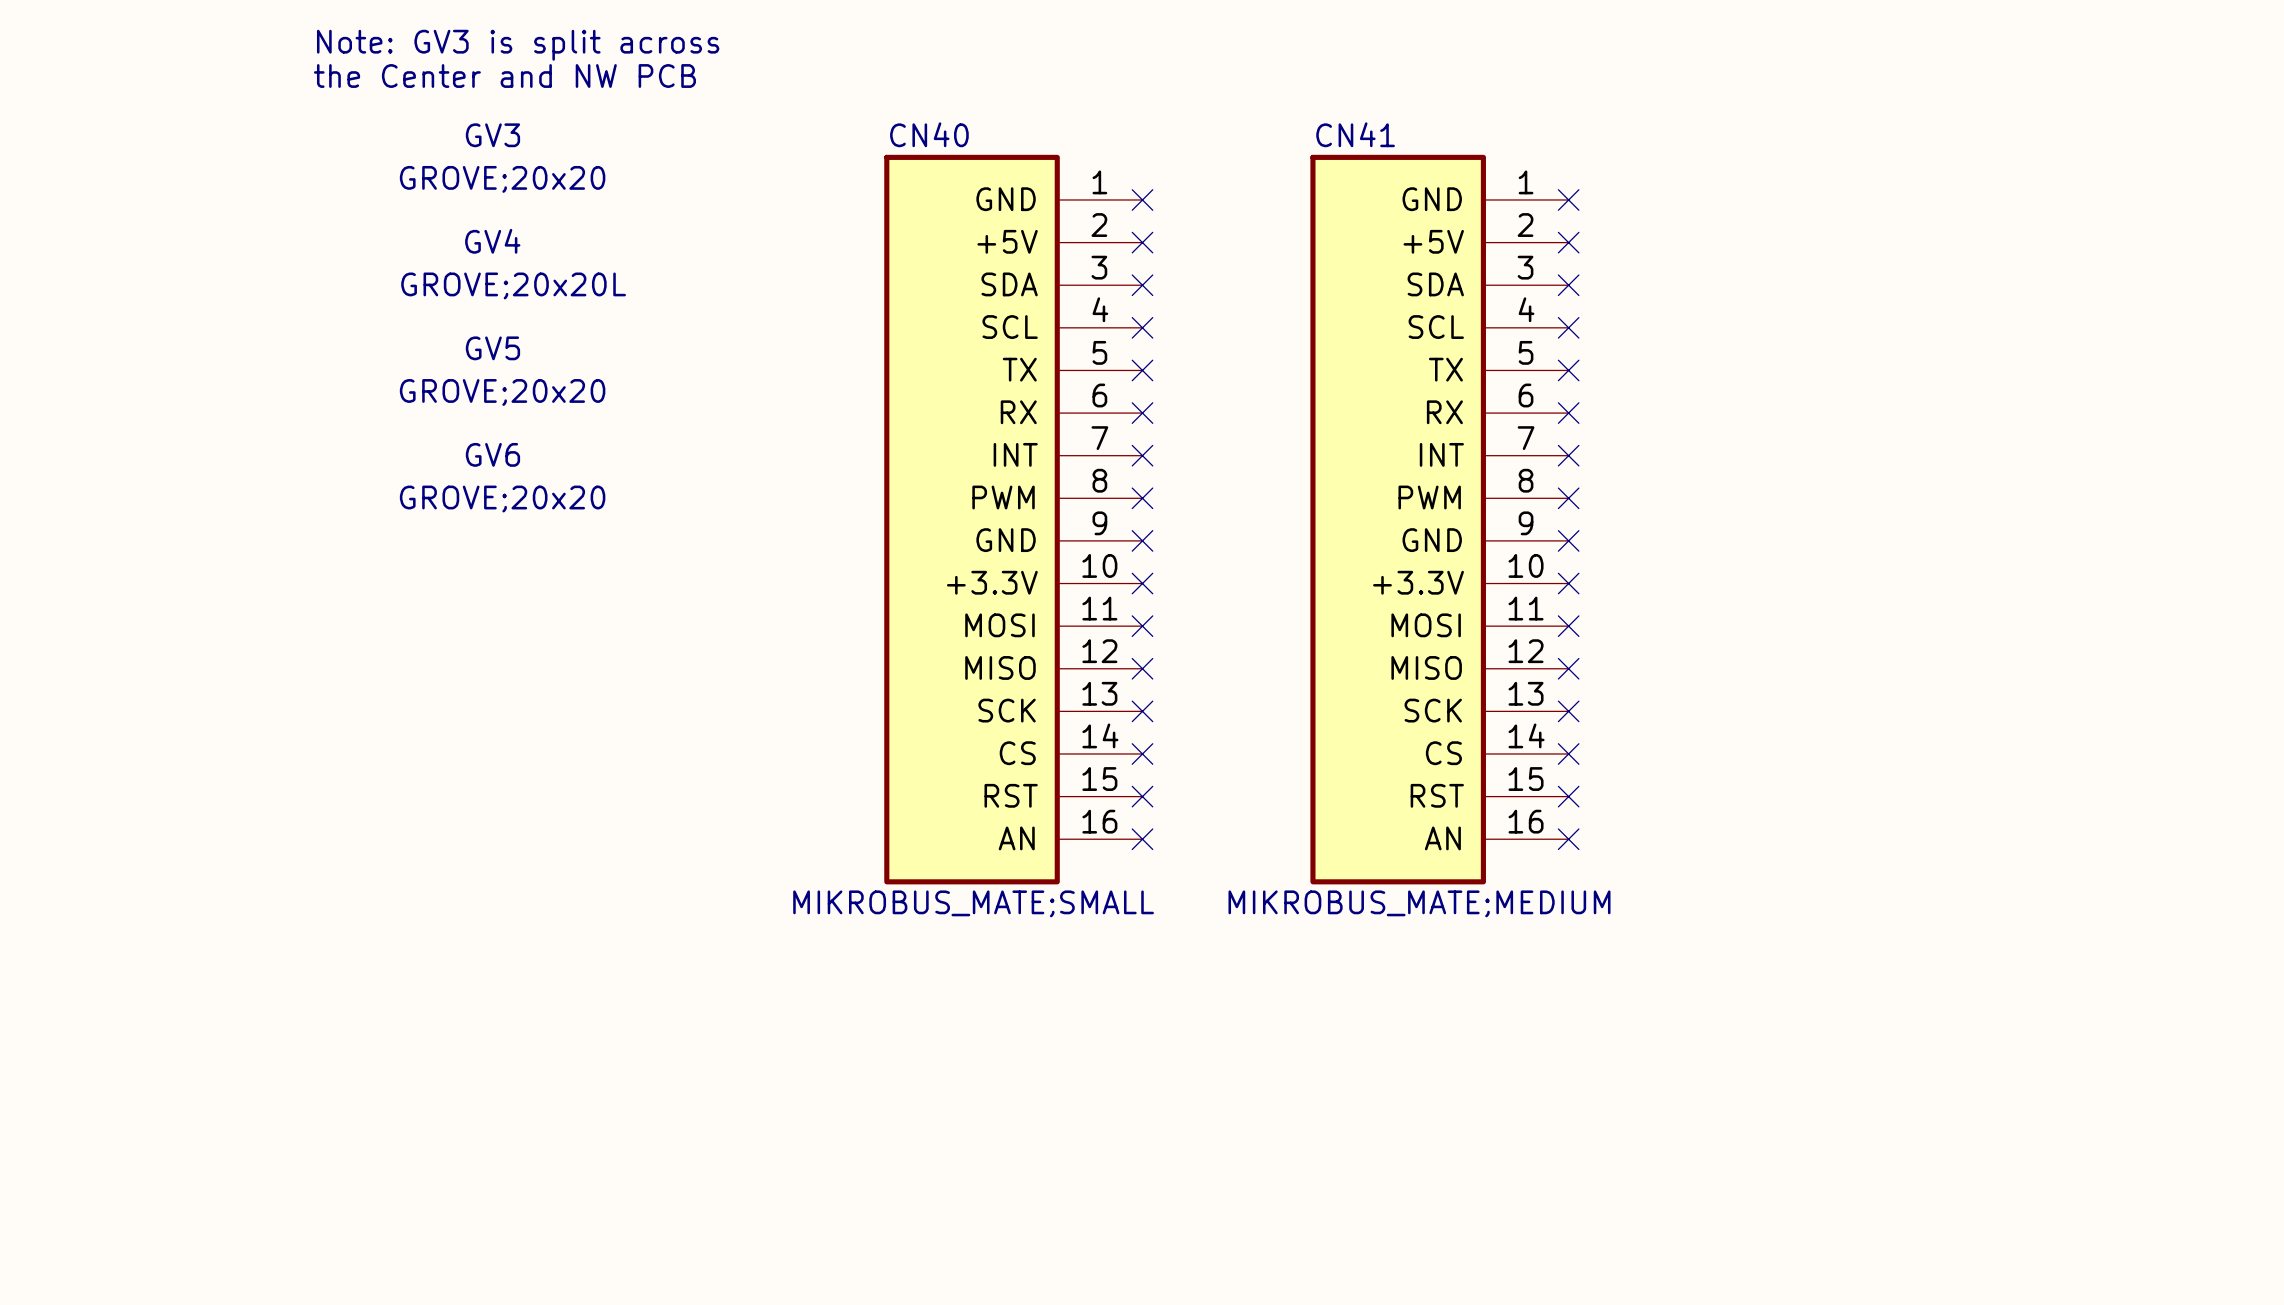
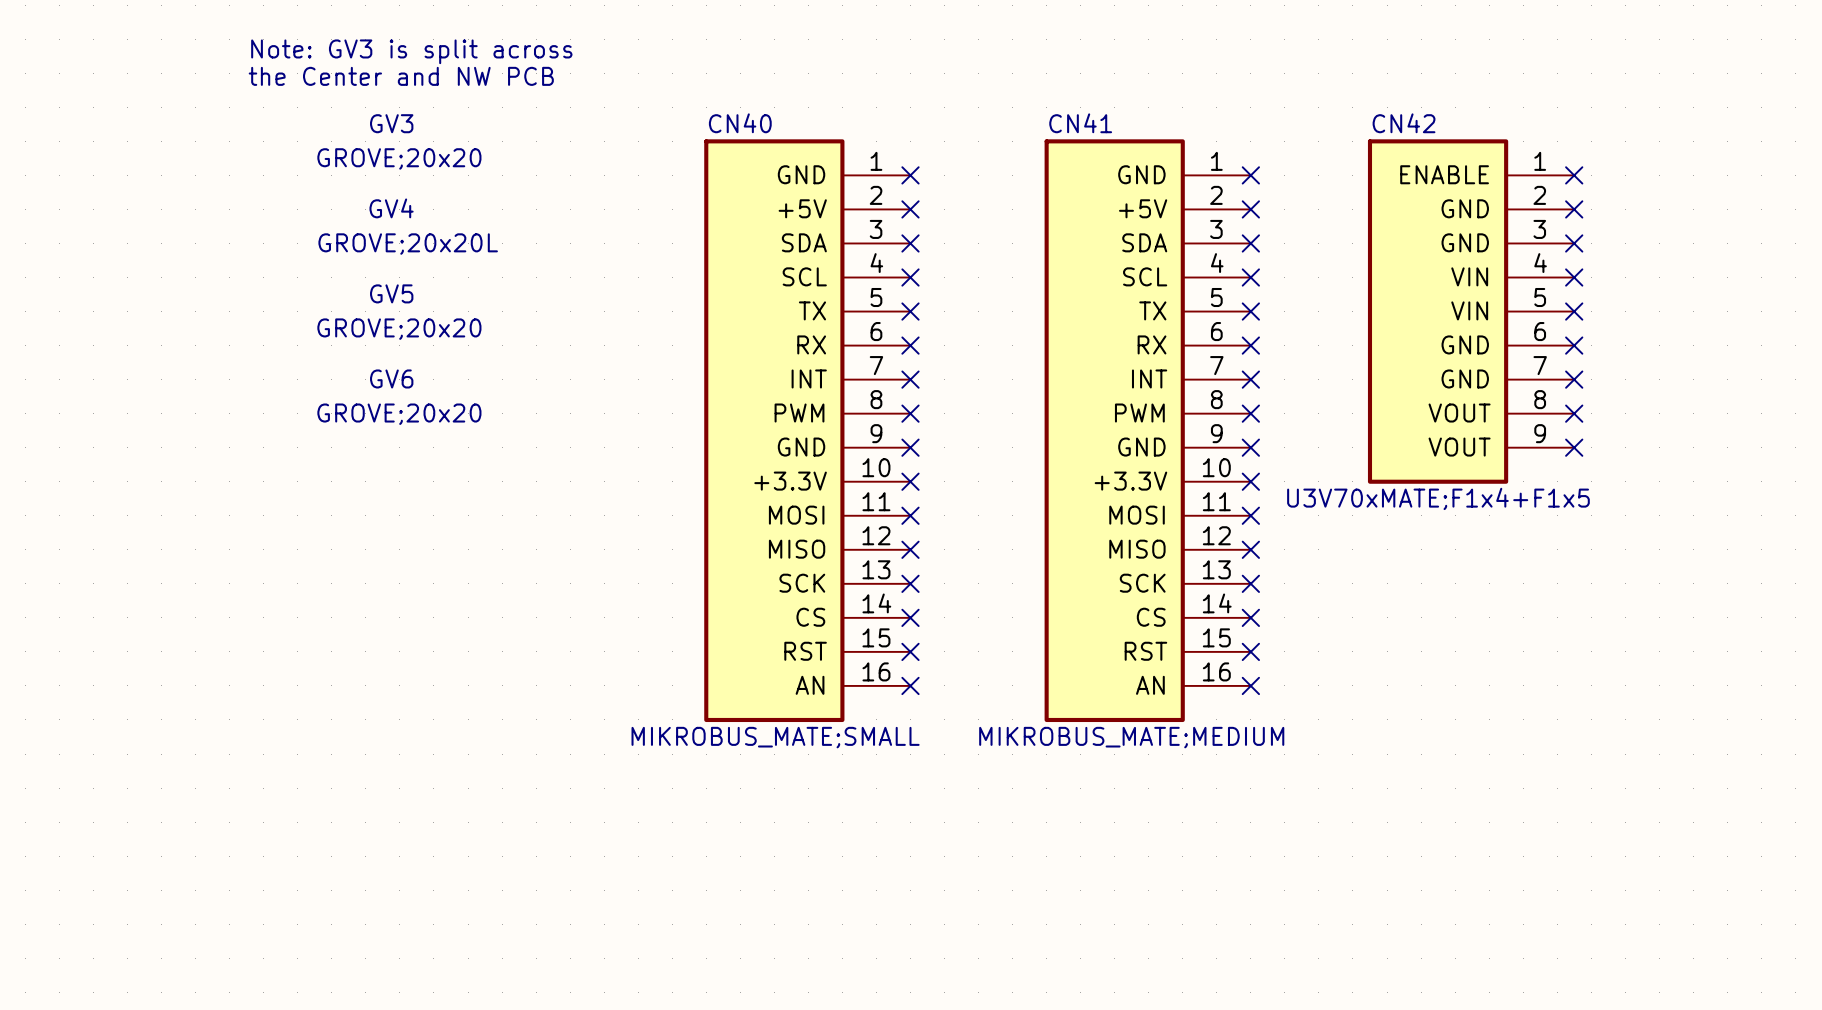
no-connect mark: none -> (1574, 175)
no-connect mark: none -> (1574, 209)
no-connect mark: none -> (1574, 243)
no-connect mark: none -> (1574, 277)
CN42: none -> U3V70xMATE;F1x4+F1x5 (1471, 311)
no-connect mark: none -> (1574, 311)
no-connect mark: none -> (1574, 345)
no-connect mark: none -> (1574, 379)
no-connect mark: none -> (1574, 413)
no-connect mark: none -> (1574, 447)

